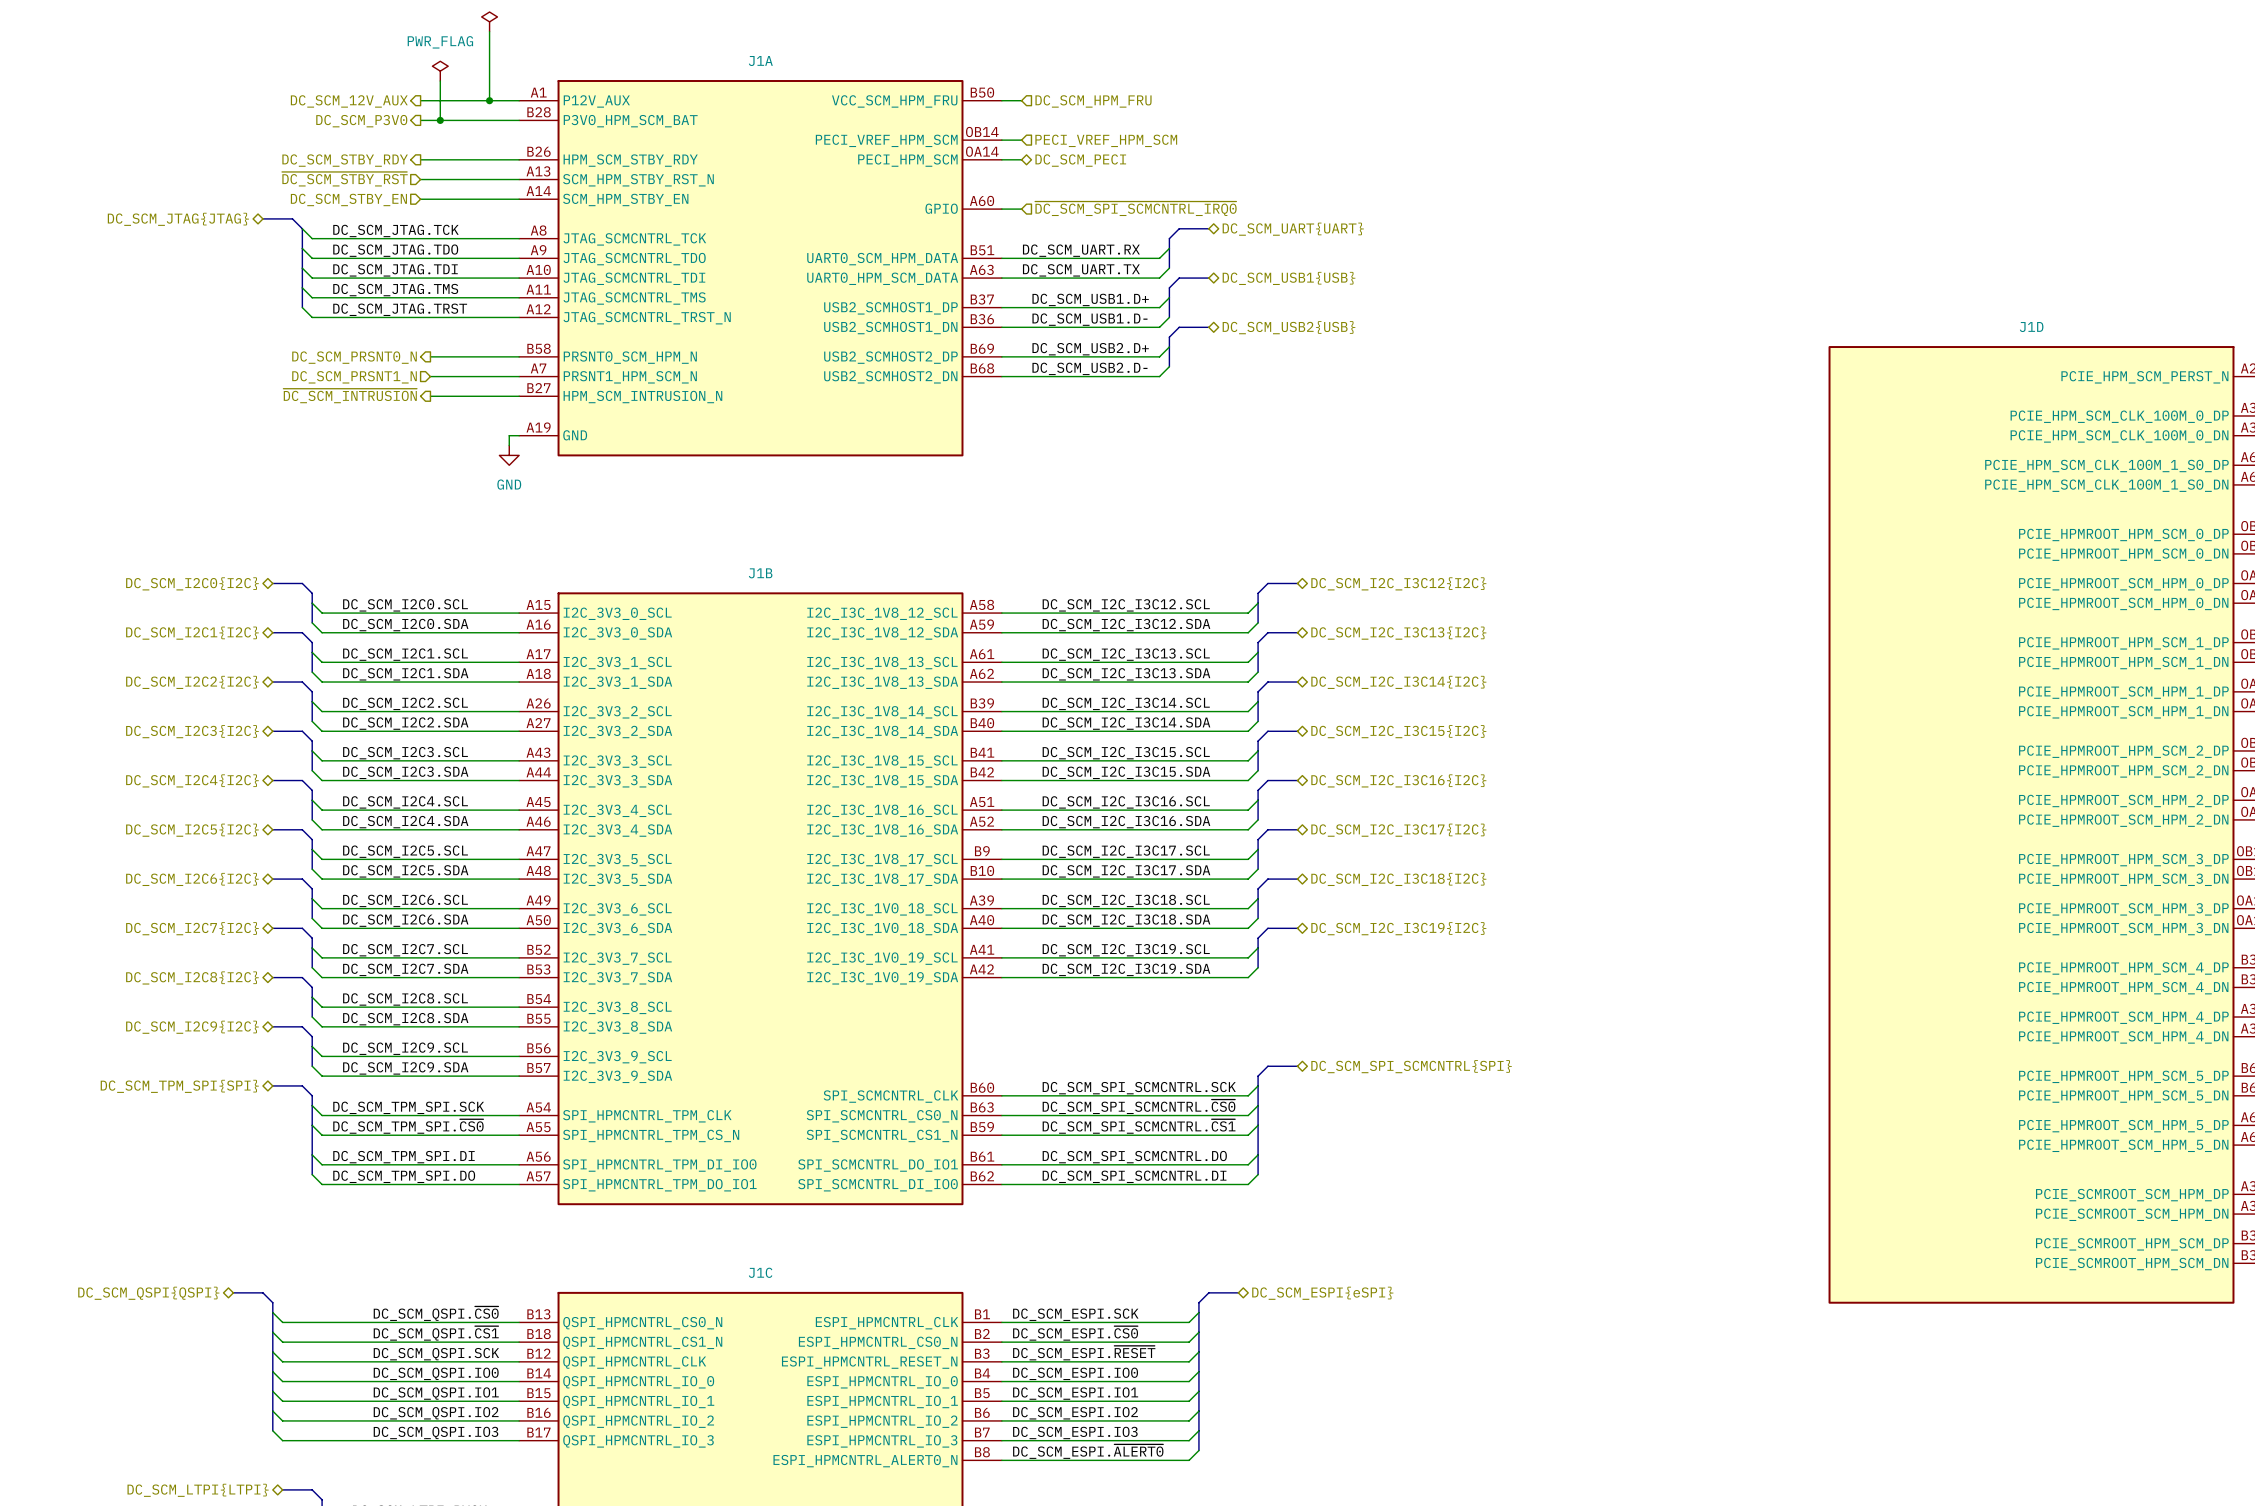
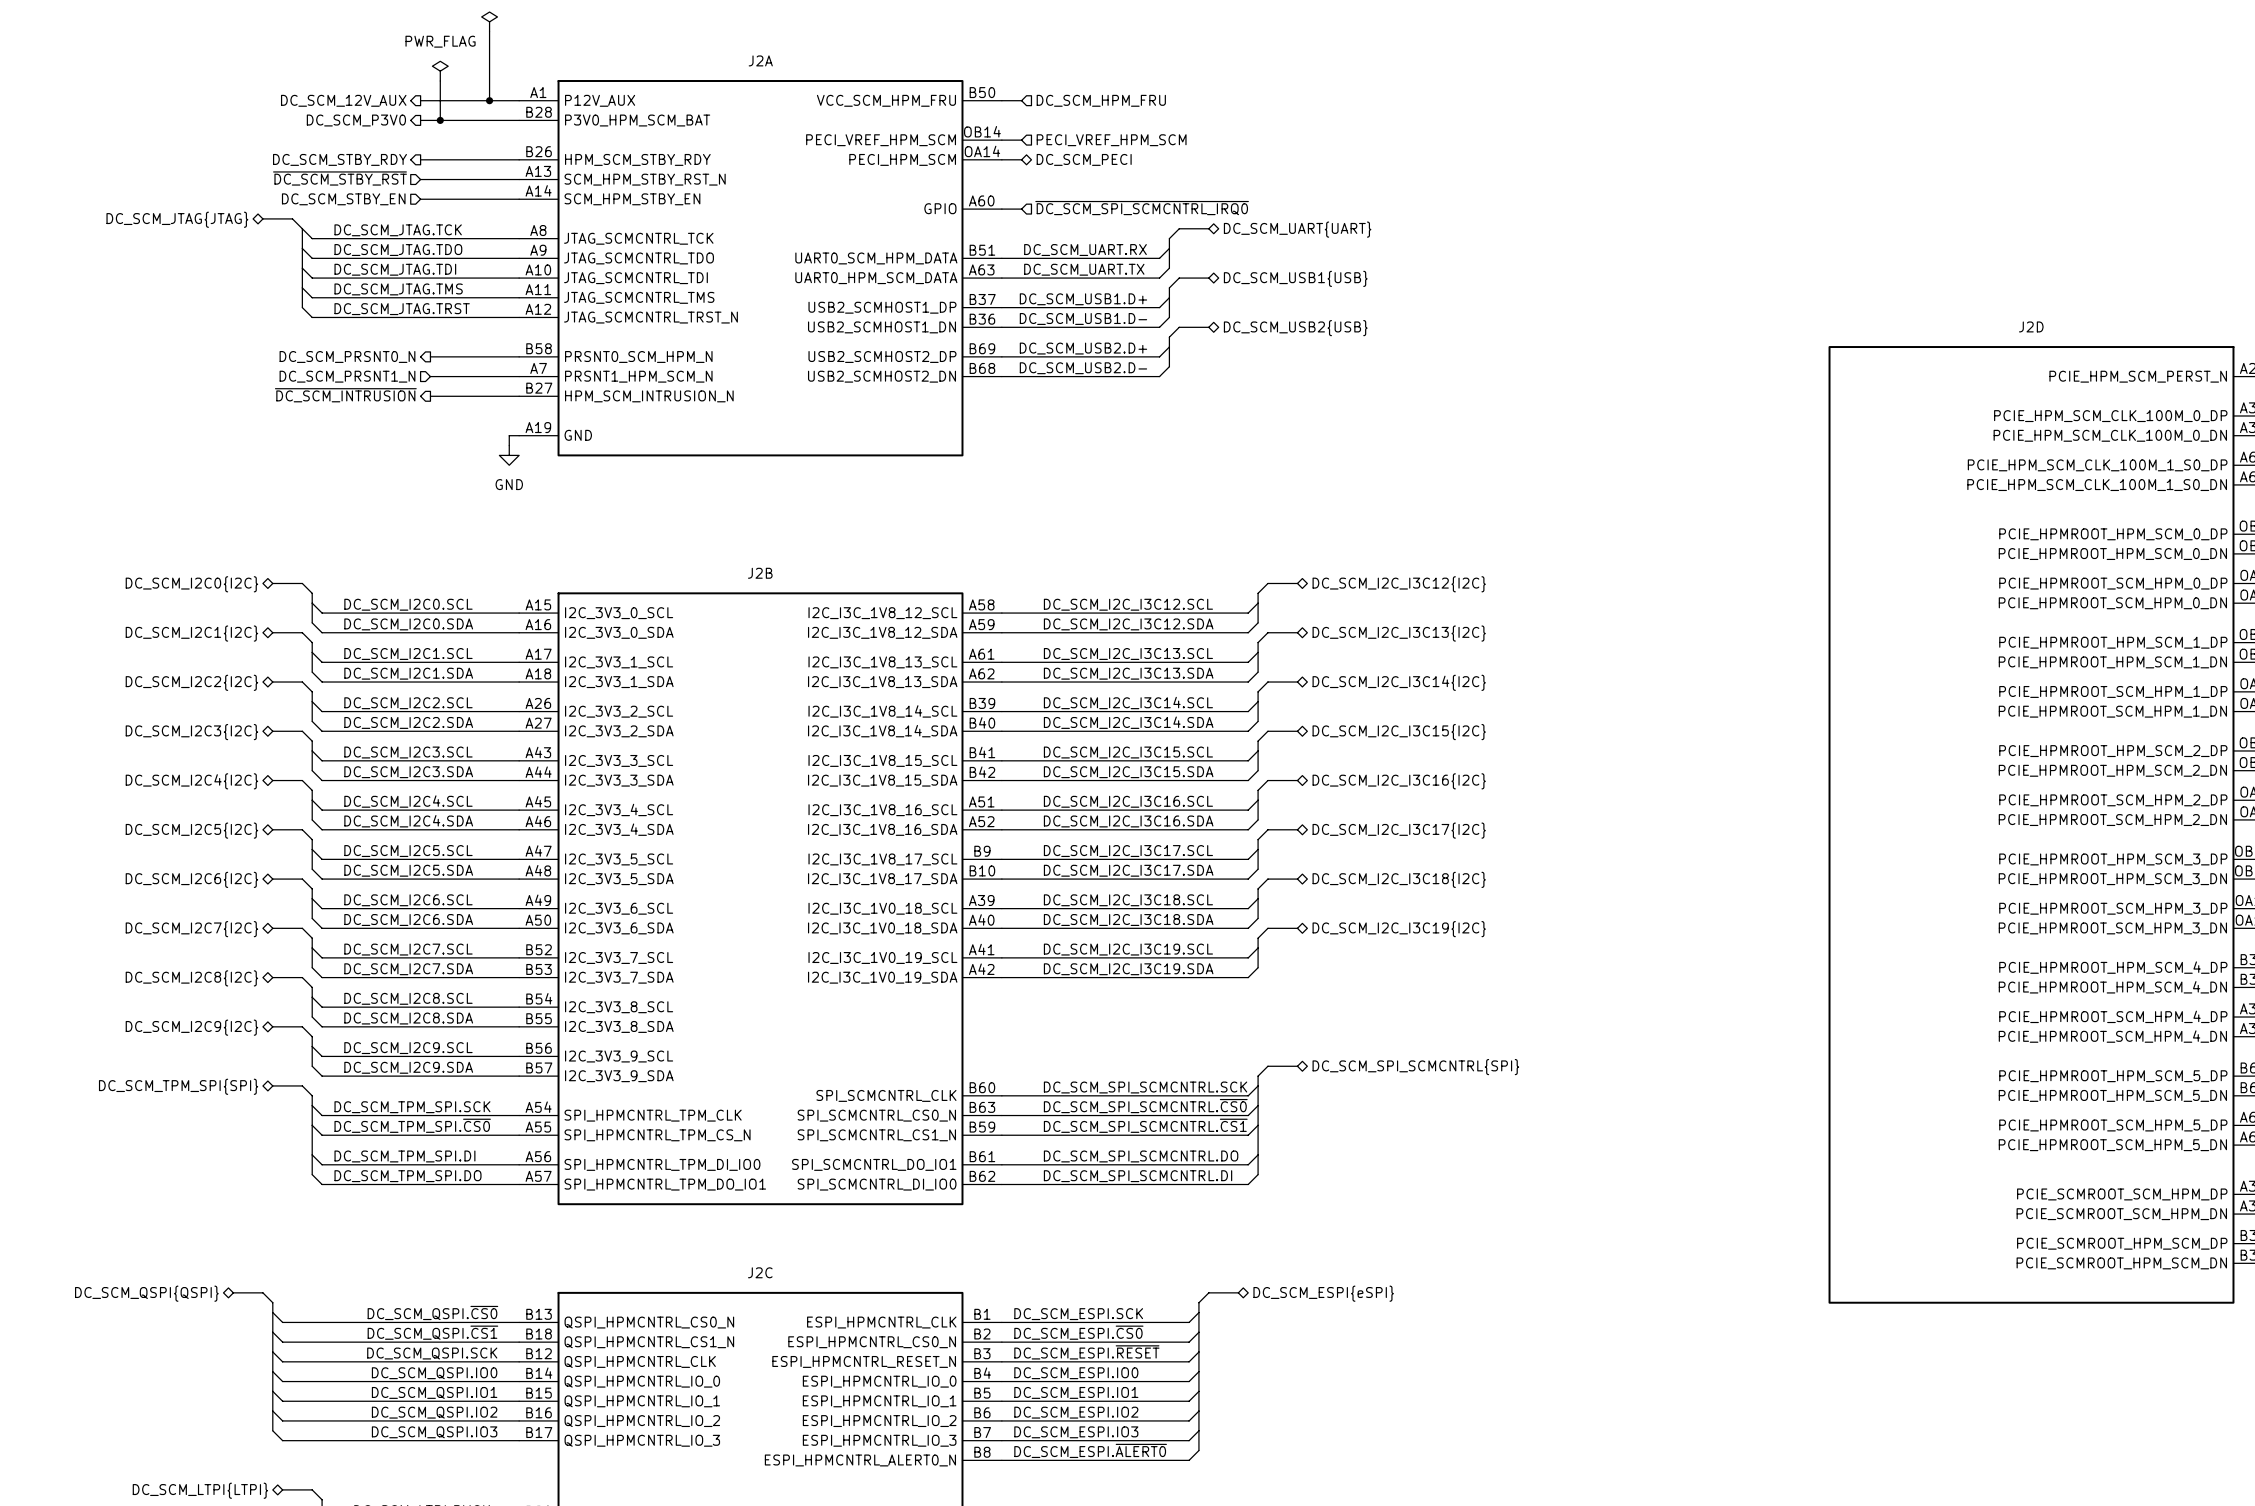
J1A name: J1A (760, 61) -> J2A (760, 60)
J1D name: J1D (2031, 327) -> J2D (2031, 326)
J1B name: J1B (760, 573) -> J2B (760, 573)
J1C name: J1C (760, 1272) -> J2C (760, 1272)

